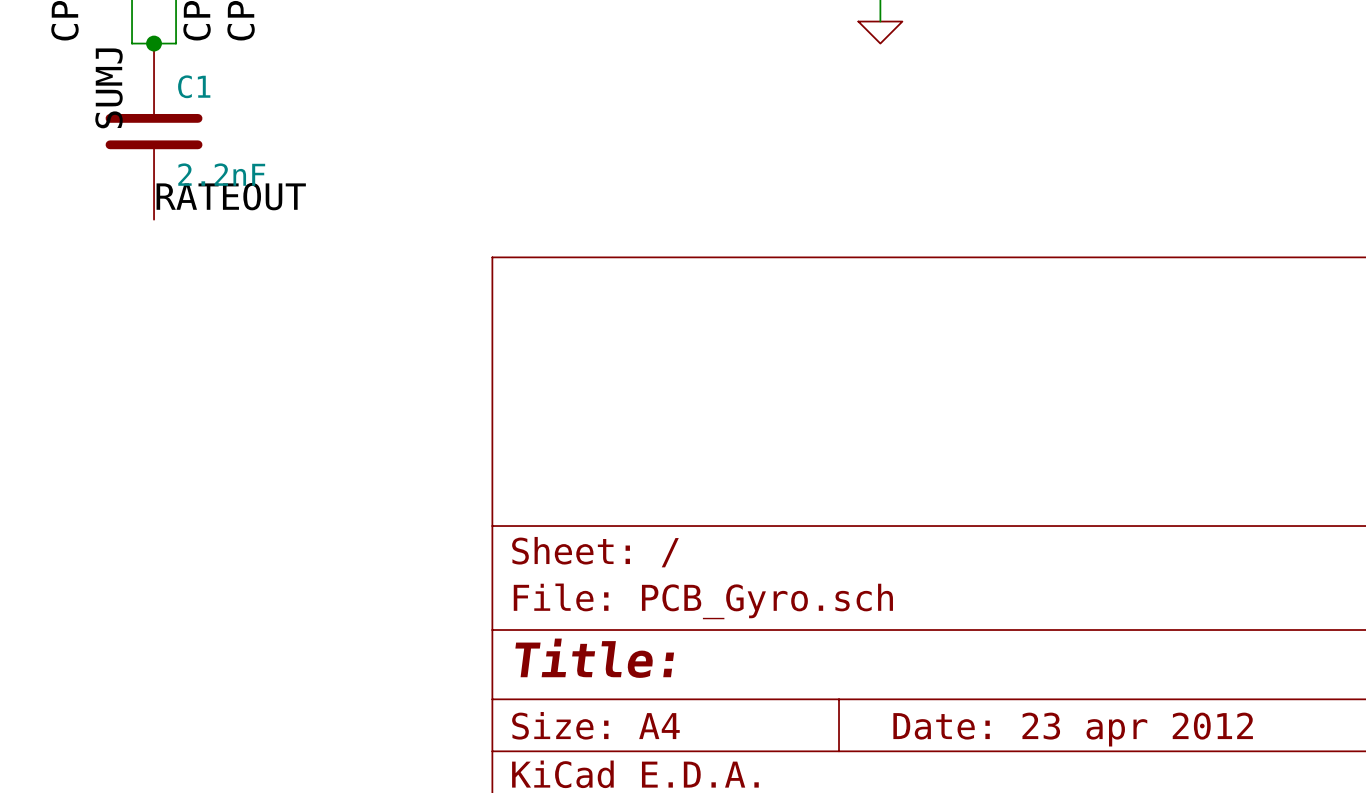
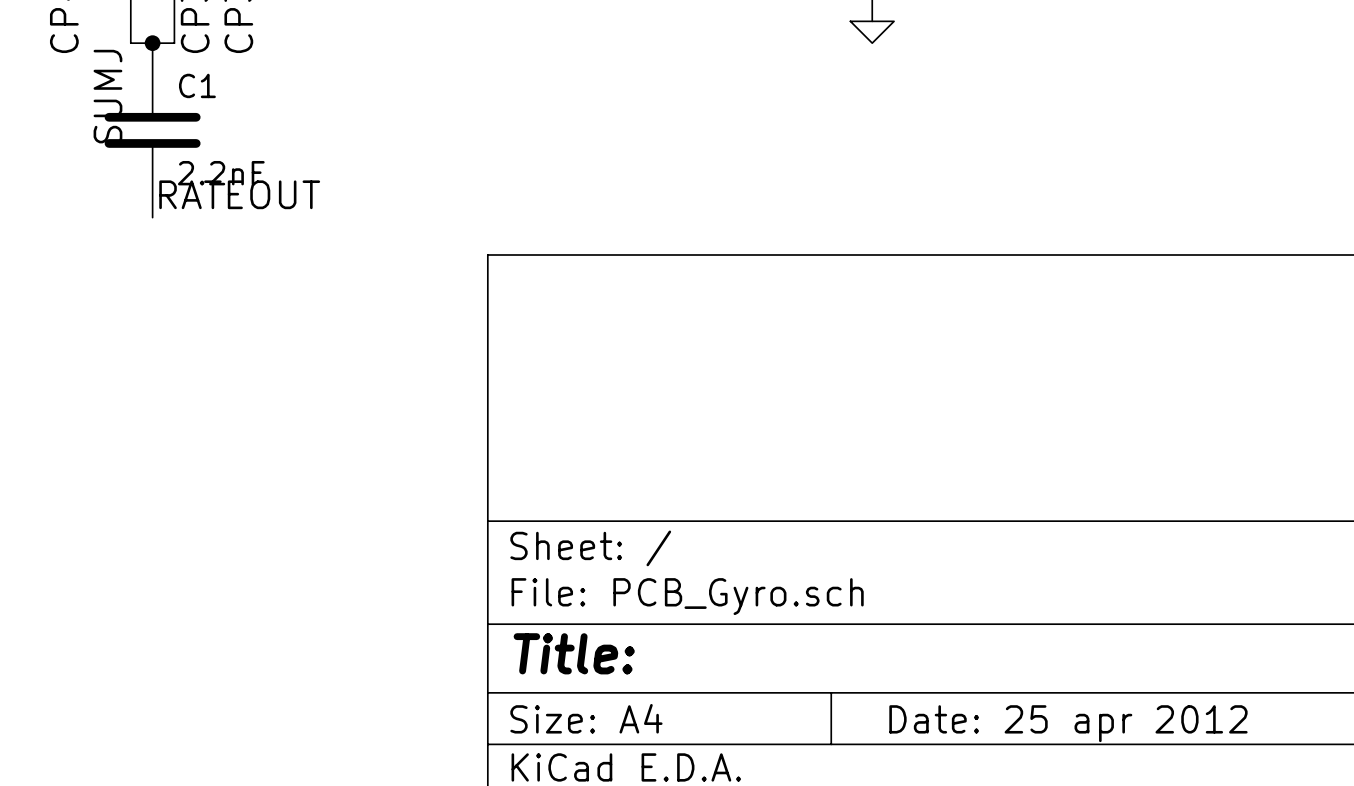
title block: Date: 23 apr 2012 (1073, 729) -> Date: 25 apr 2012 (1068, 723)

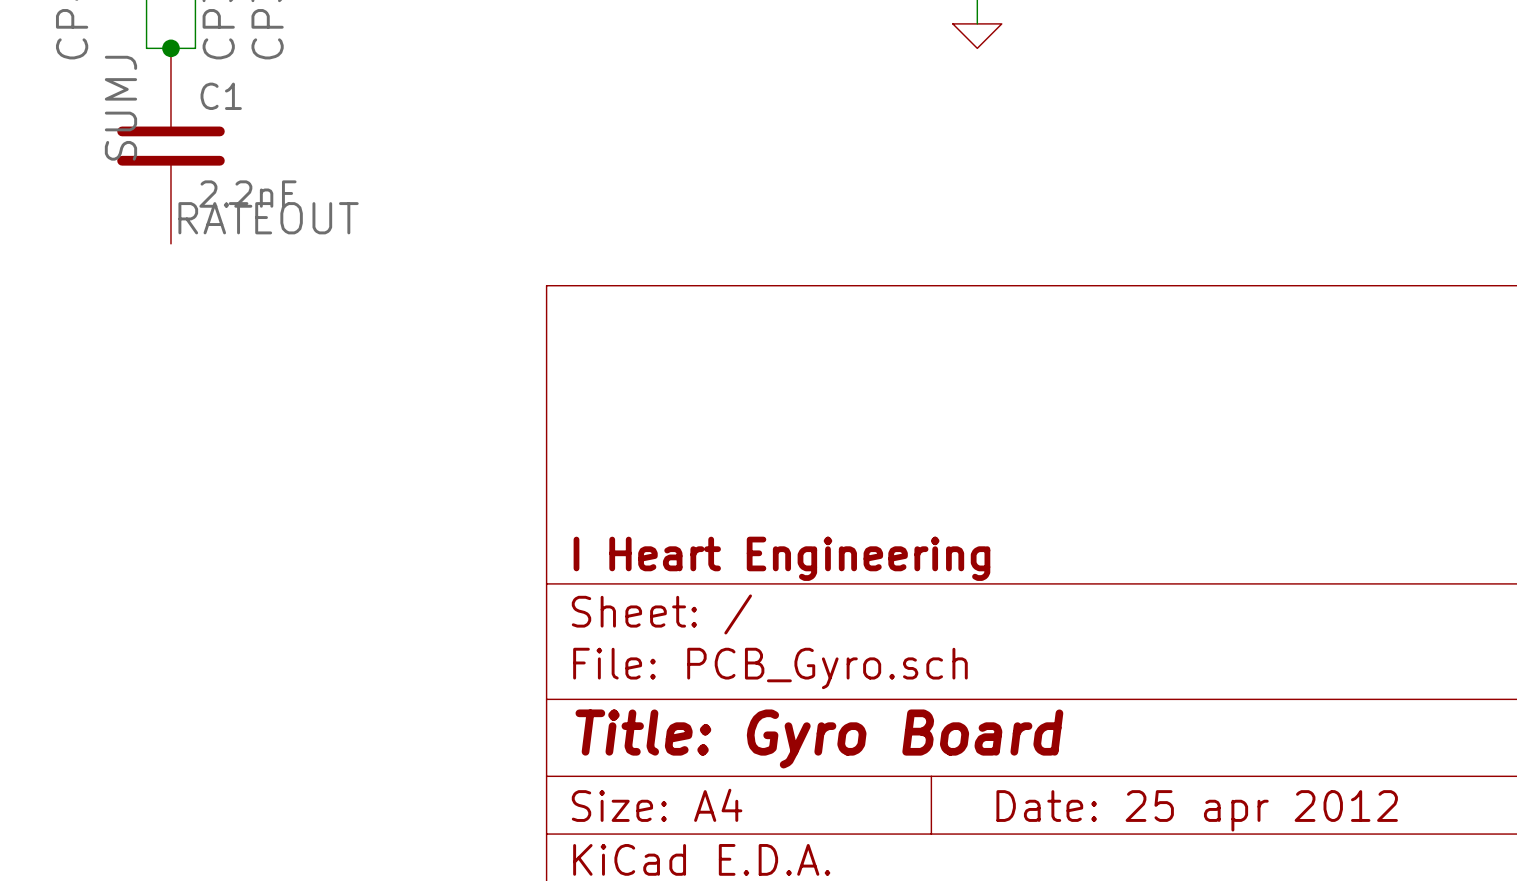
title block: none -> I Heart Engineering (781, 558)
title block: Title: (574, 653) -> Title: Gyro Board (819, 738)

